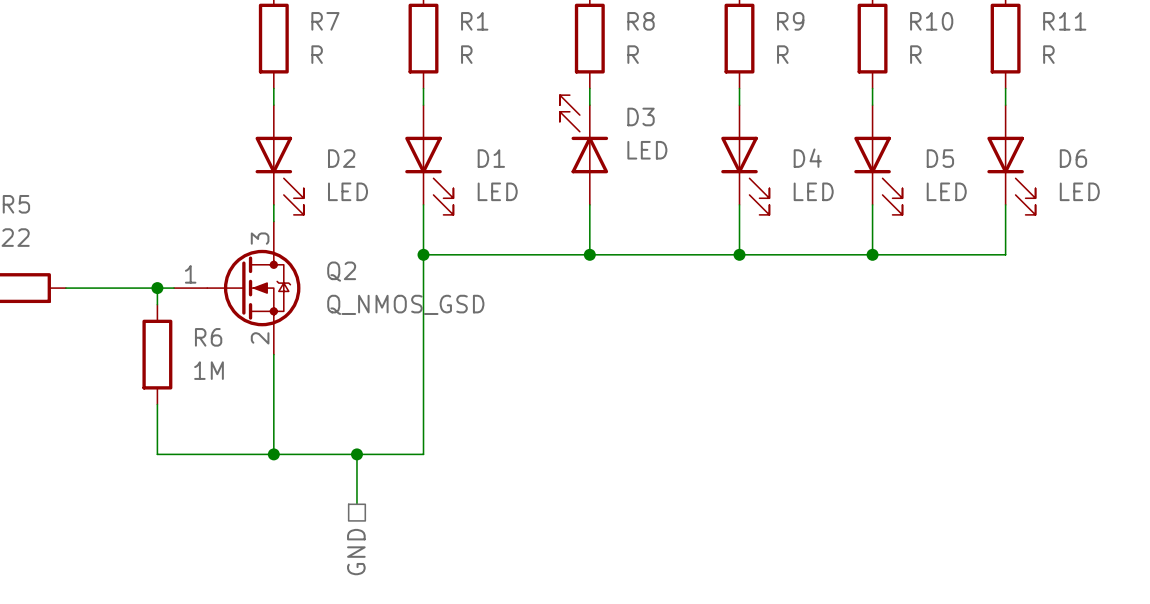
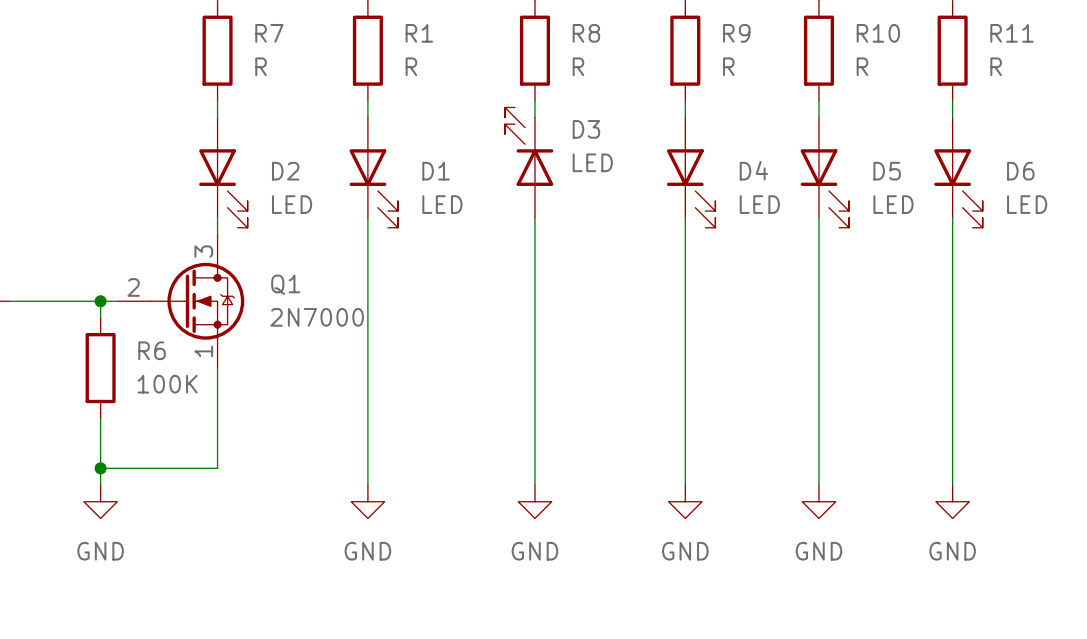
wire: (423, 254) (1005, 254) -> (952, 485) (952, 267)
junction: (423, 254) -> none
wire: none -> (534, 267) (534, 485)
junction: (589, 254) -> none
wire: none -> (685, 267) (685, 485)
junction: (739, 254) -> none
wire: none -> (818, 267) (818, 485)
junction: (872, 254) -> none
Q2 name: Q2 (341, 271) -> Q1 (285, 284)
Q2 pin number: 1 (190, 274) -> 2 (133, 287)
Q2 value: Q_NMOS_GSD (405, 304) -> 2N7000 (317, 317)
Q2 pin number: 2 (260, 338) -> 1 (203, 351)
R6 value: 1M (209, 370) -> 100K (167, 384)
wire: none -> (100, 468) (100, 485)
junction: none -> (100, 468)
wire: (273, 454) (423, 454) -> (367, 485) (367, 468)
junction: (273, 454) -> none
wire: (356, 454) (356, 504) -> none
junction: (356, 454) -> none
power symbol: none -> GND (100, 501)
power symbol: none -> GND (367, 501)
power symbol: none -> GND (534, 501)
power symbol: none -> GND (685, 501)
power symbol: none -> GND (818, 501)
power symbol: none -> GND (952, 501)
hierarchical label: GND (356, 552) -> none

